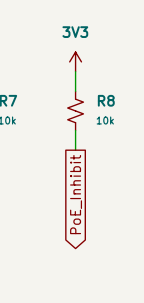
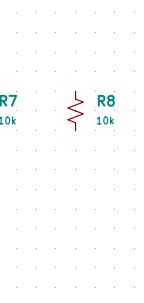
power symbol: 3V3 (75, 61) -> none
wire: (75, 71) (75, 91) -> none
wire: (75, 130) (75, 150) -> none
global label: PoE_Inhibit (76, 194) -> none

